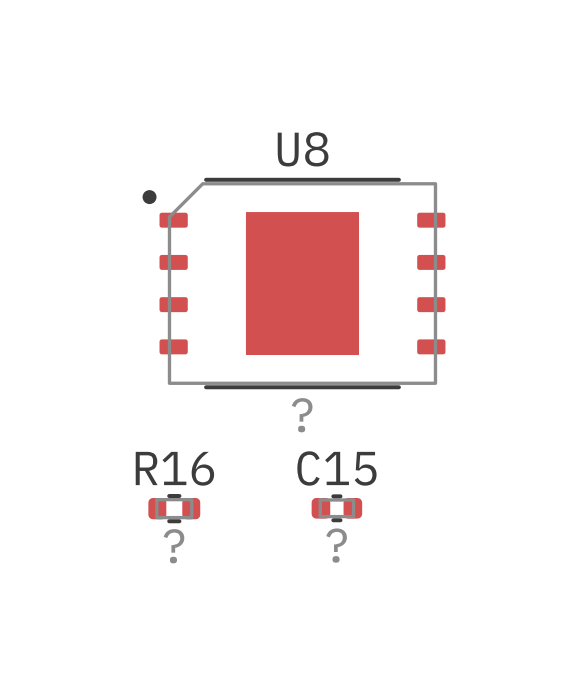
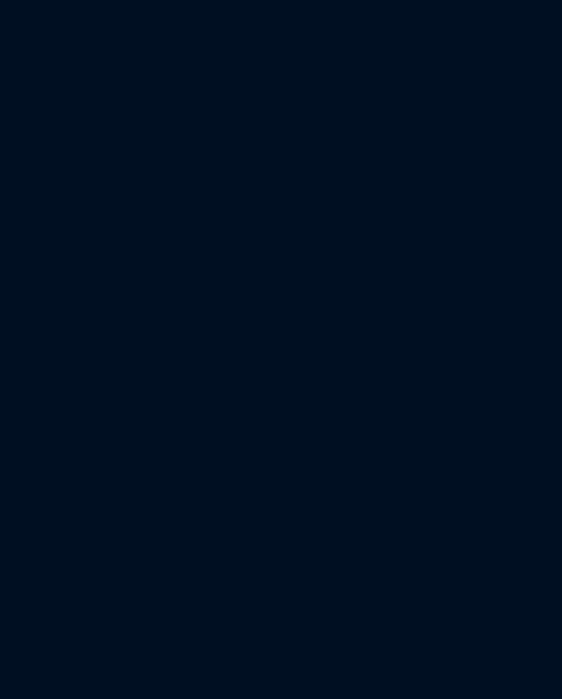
U8: ? (294, 283) -> none
R16: ? (174, 508) -> none
C15: ? (336, 508) -> none

